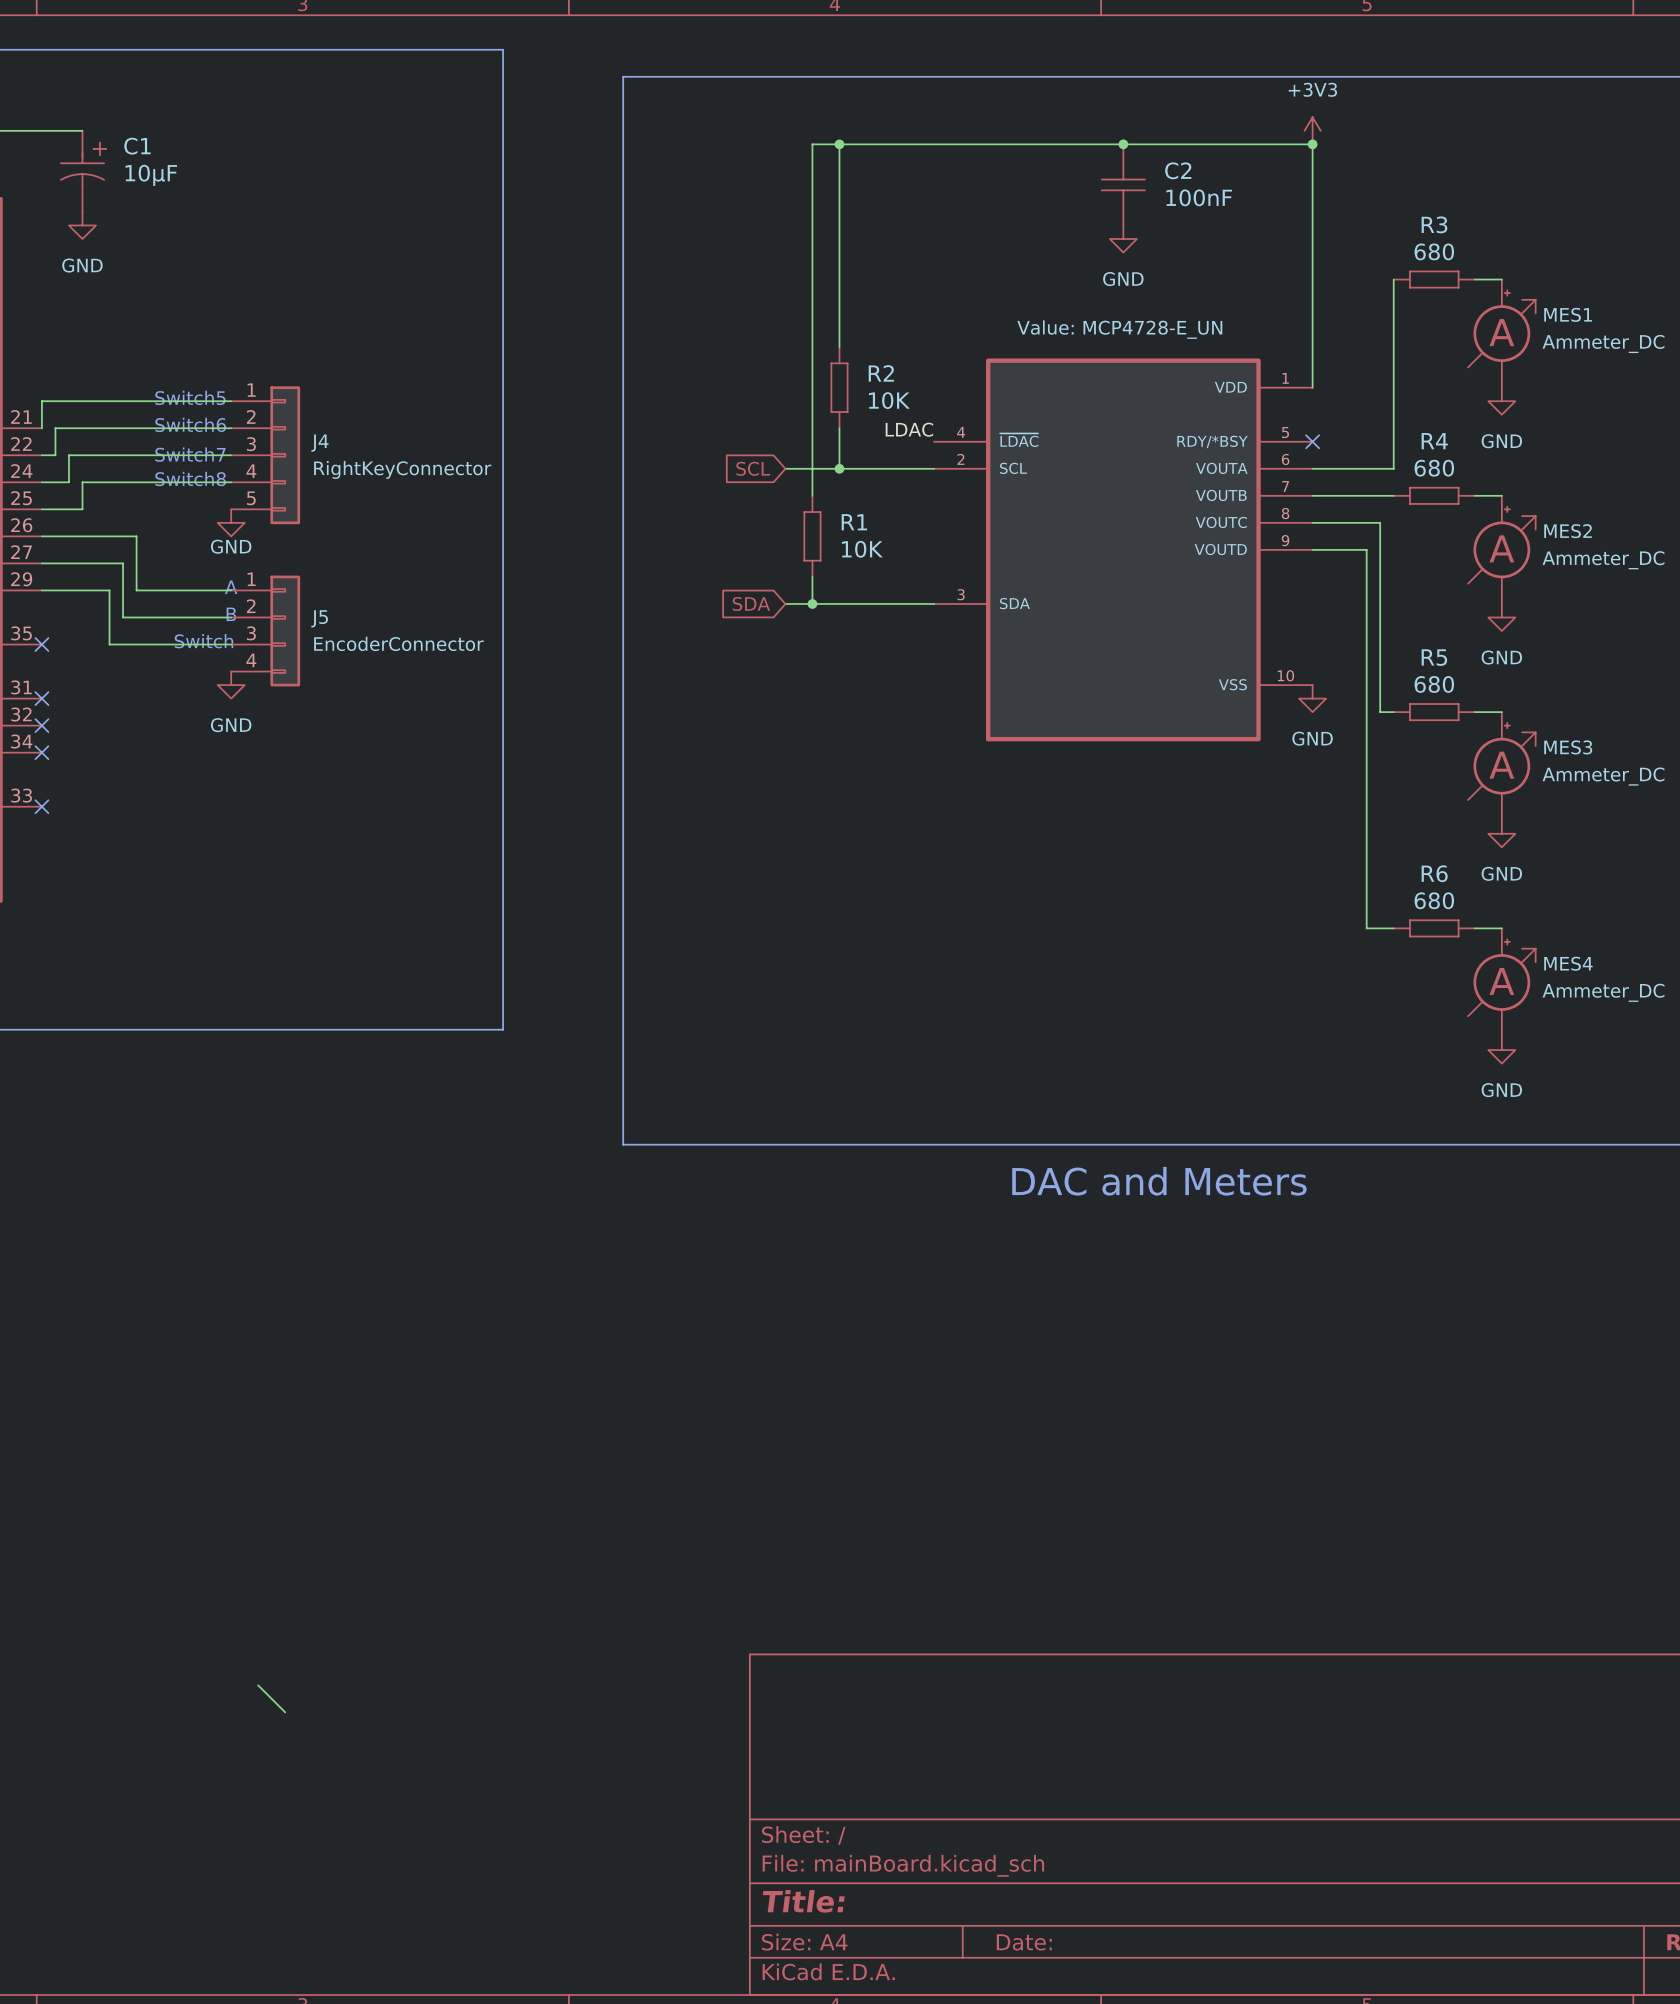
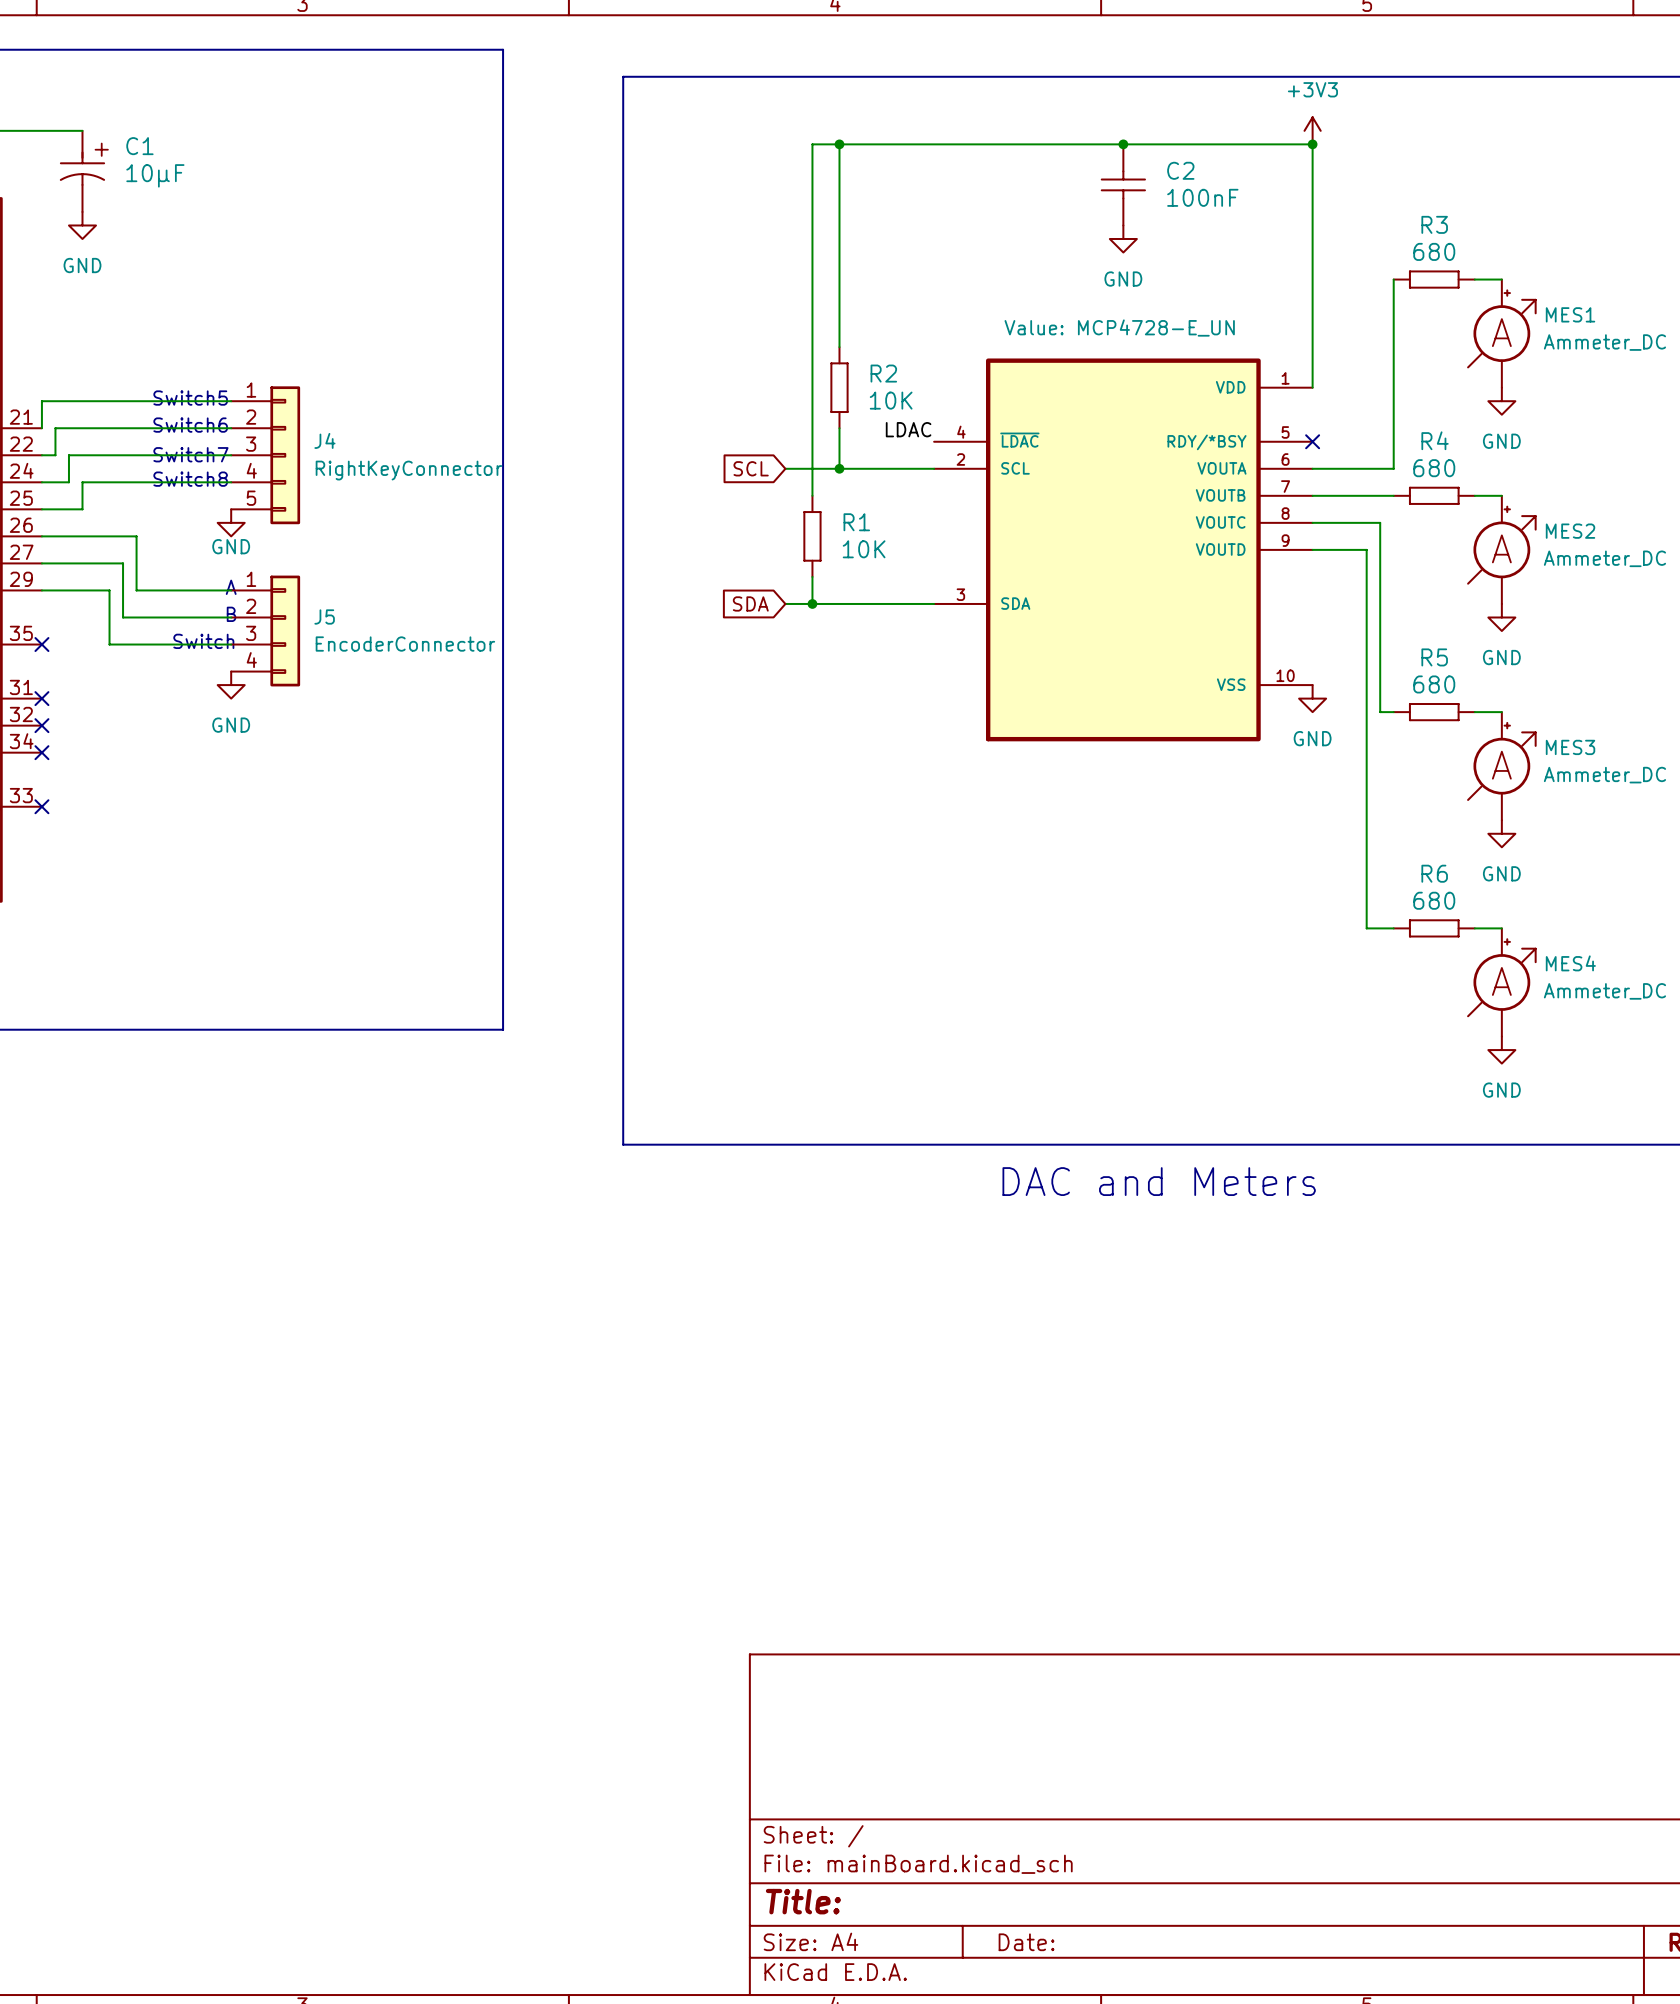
wire: (258, 1685) (285, 1712) -> none

